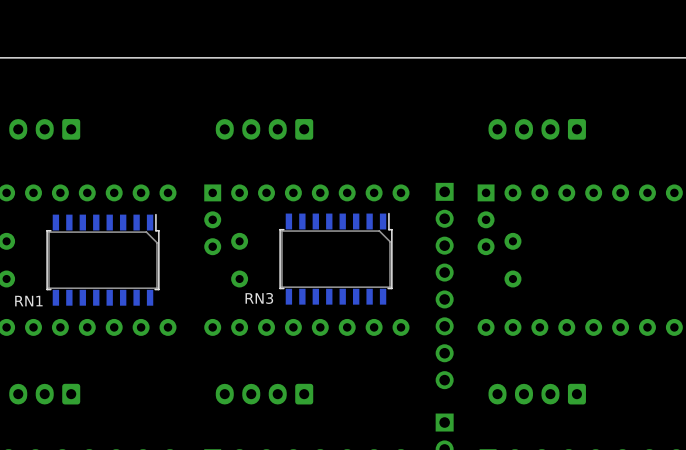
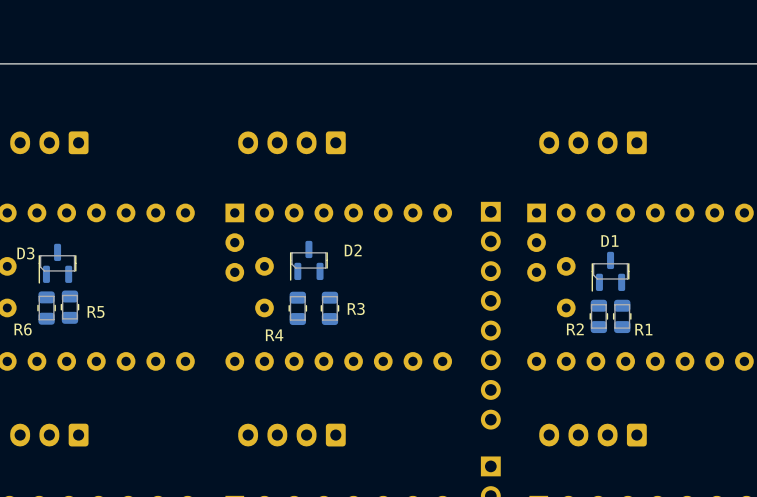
D2: none -> (308, 260)
D3: none -> (57, 263)
D1: none -> (610, 271)
RN3: (335, 258) -> none
RN1: (102, 259) -> none
R5: none -> (69, 307)
R6: none -> (46, 308)
R4: none -> (297, 308)
R3: none -> (329, 308)
R2: none -> (598, 316)
R1: none -> (622, 316)

